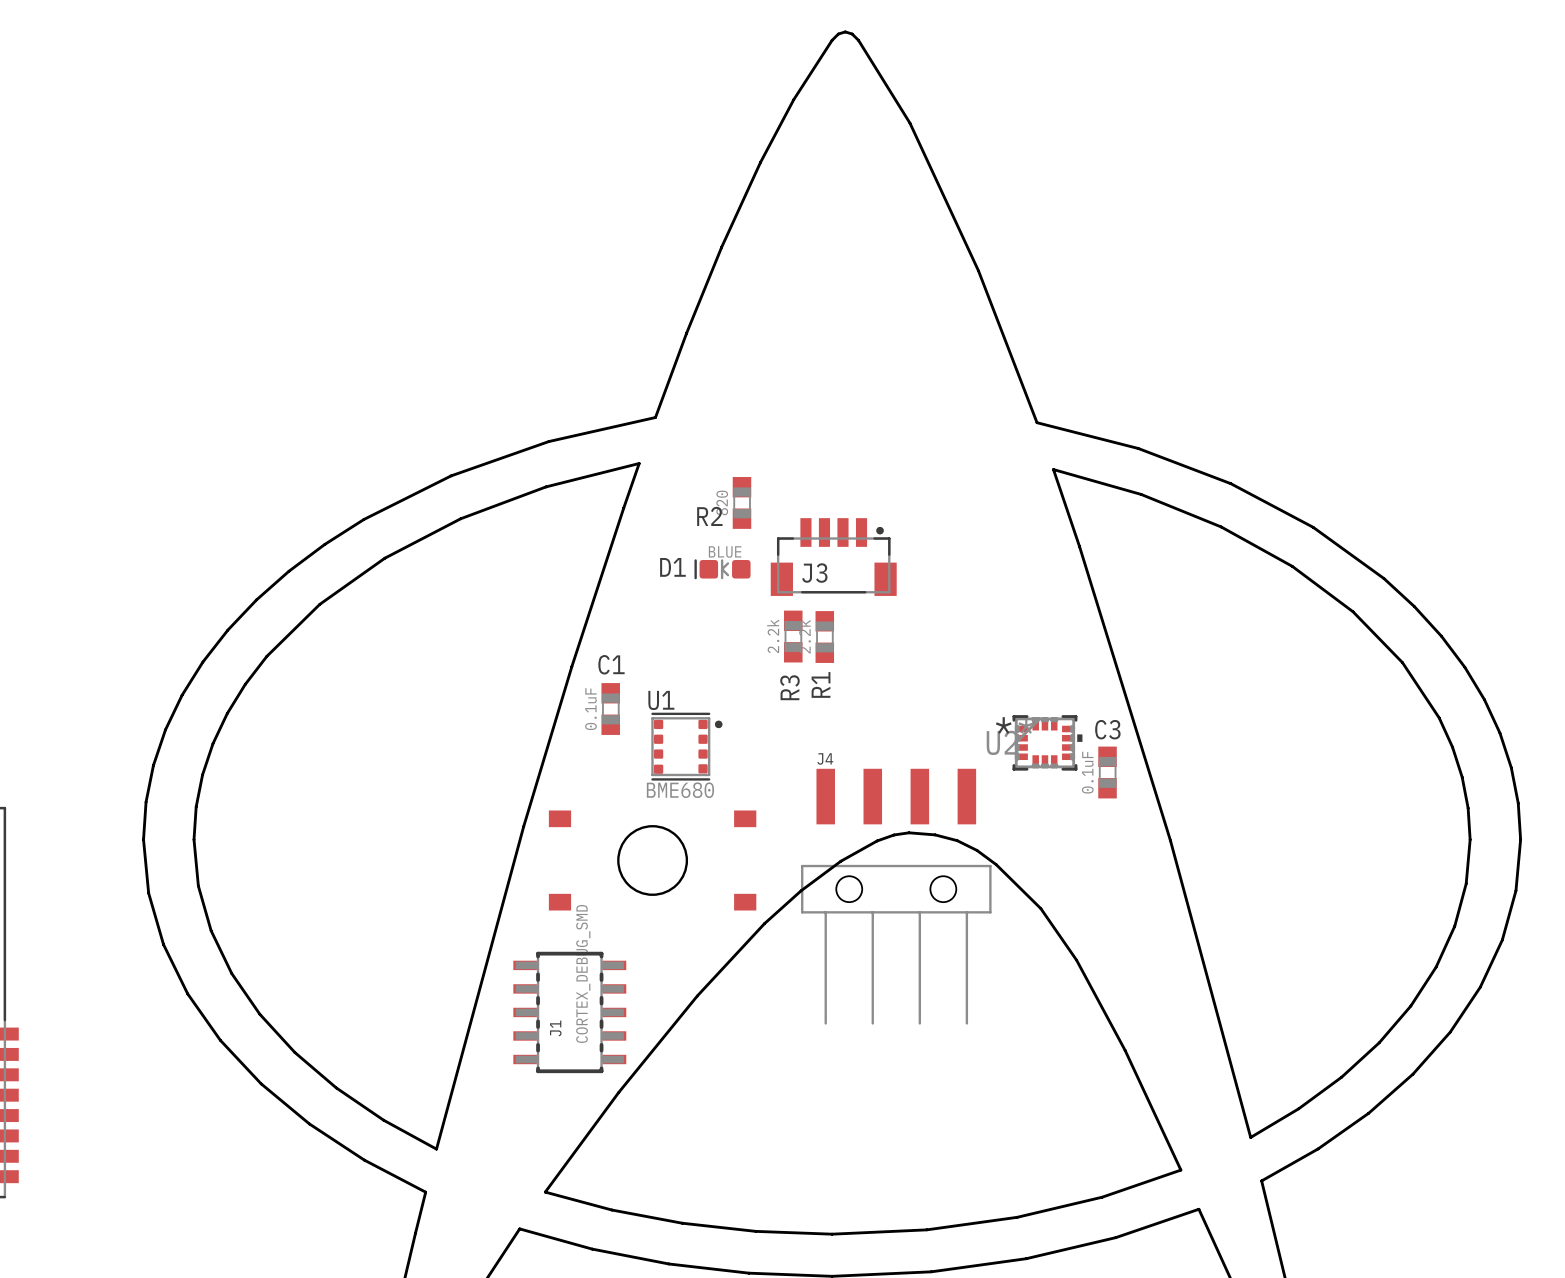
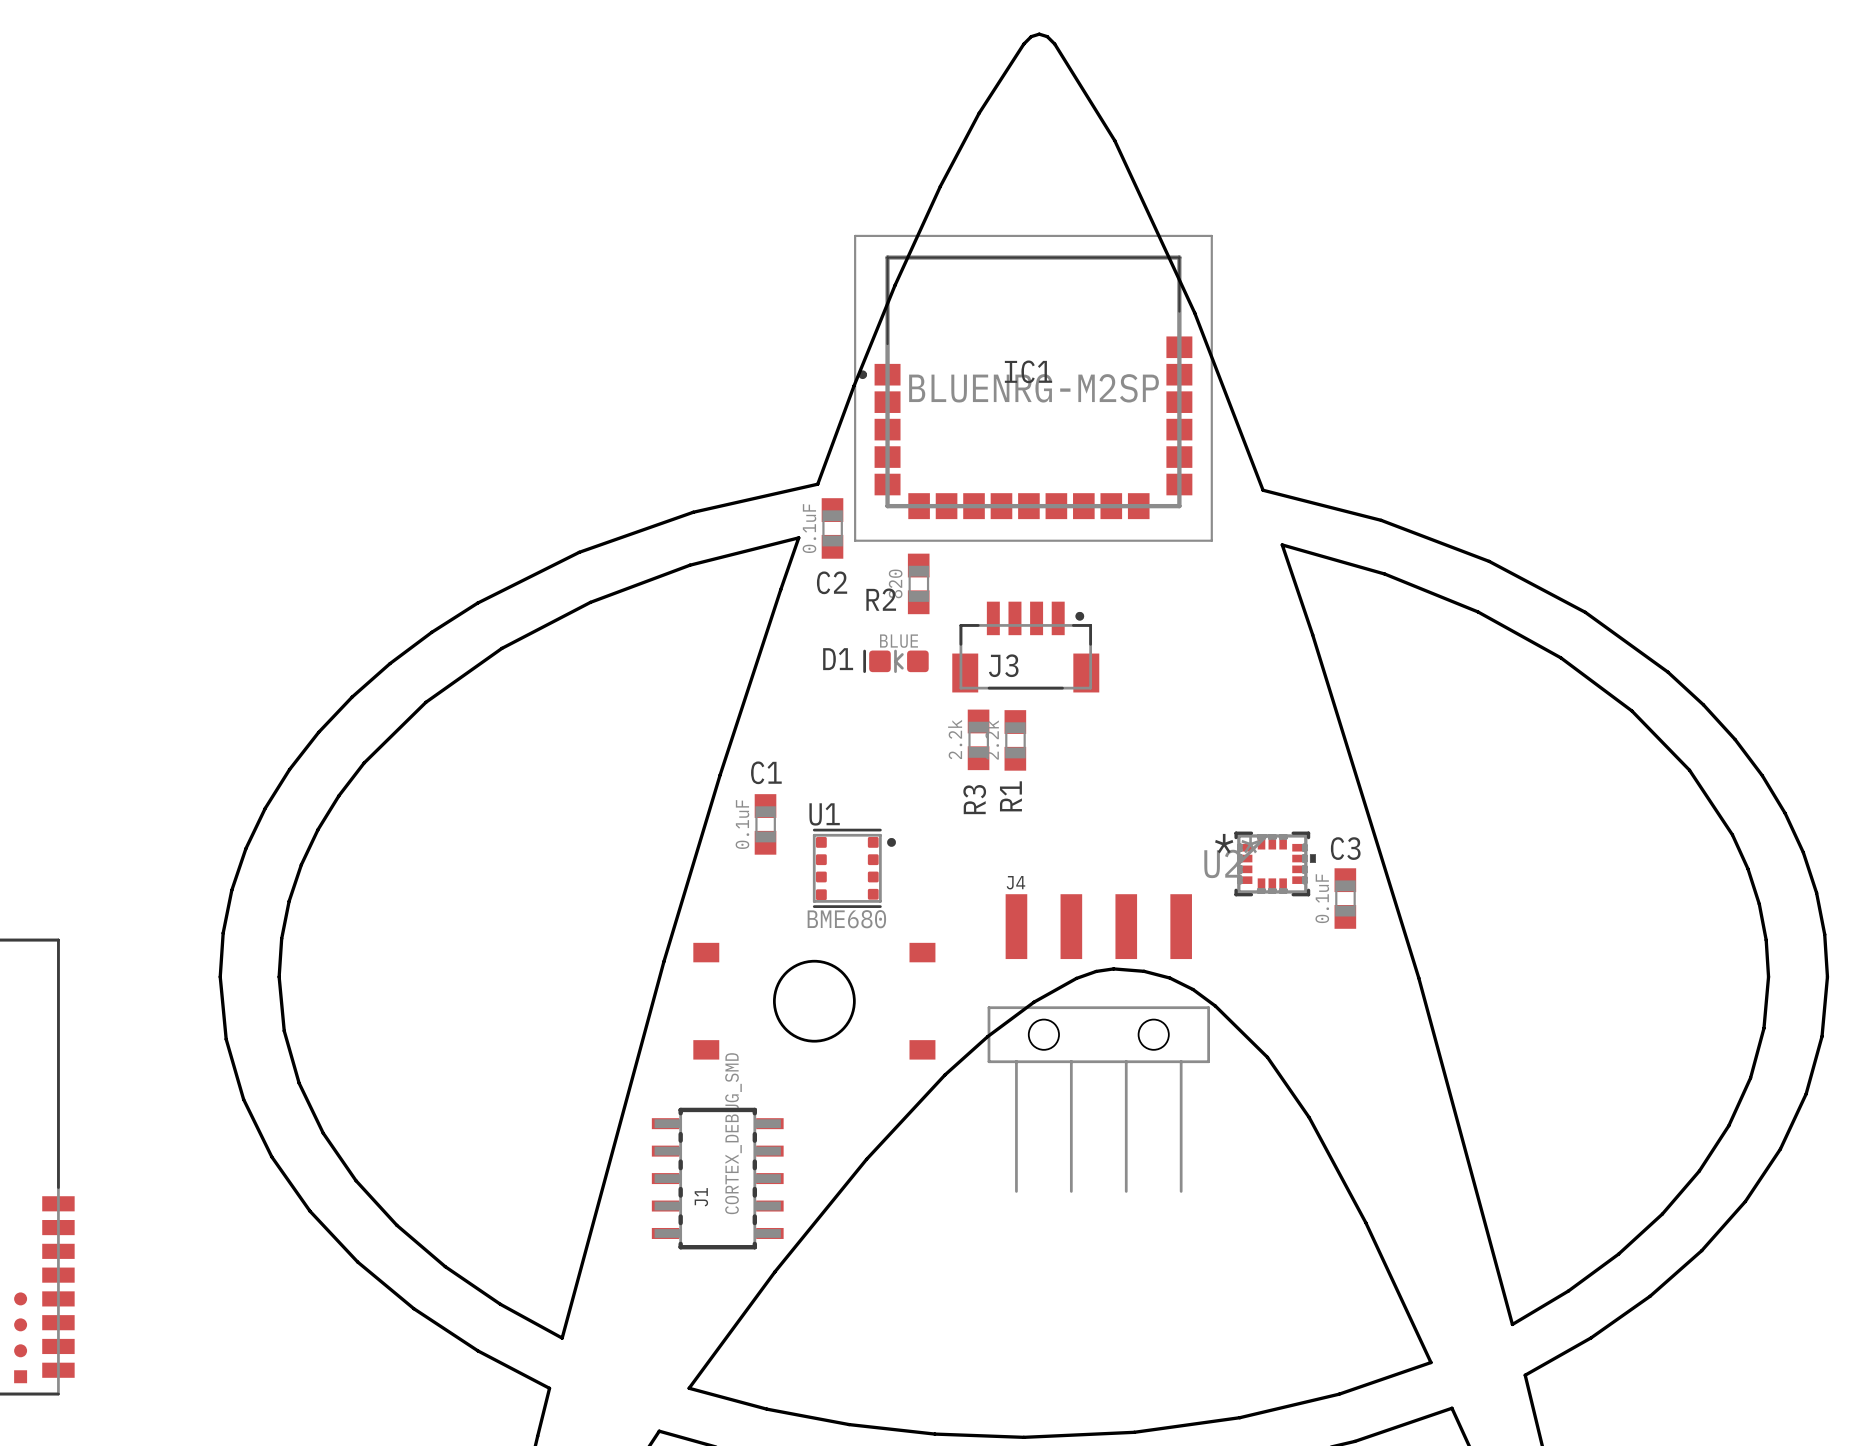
IC1: none -> BLUENRG-M2SP (1033, 388)
C2: none -> 0.1uF (832, 528)

